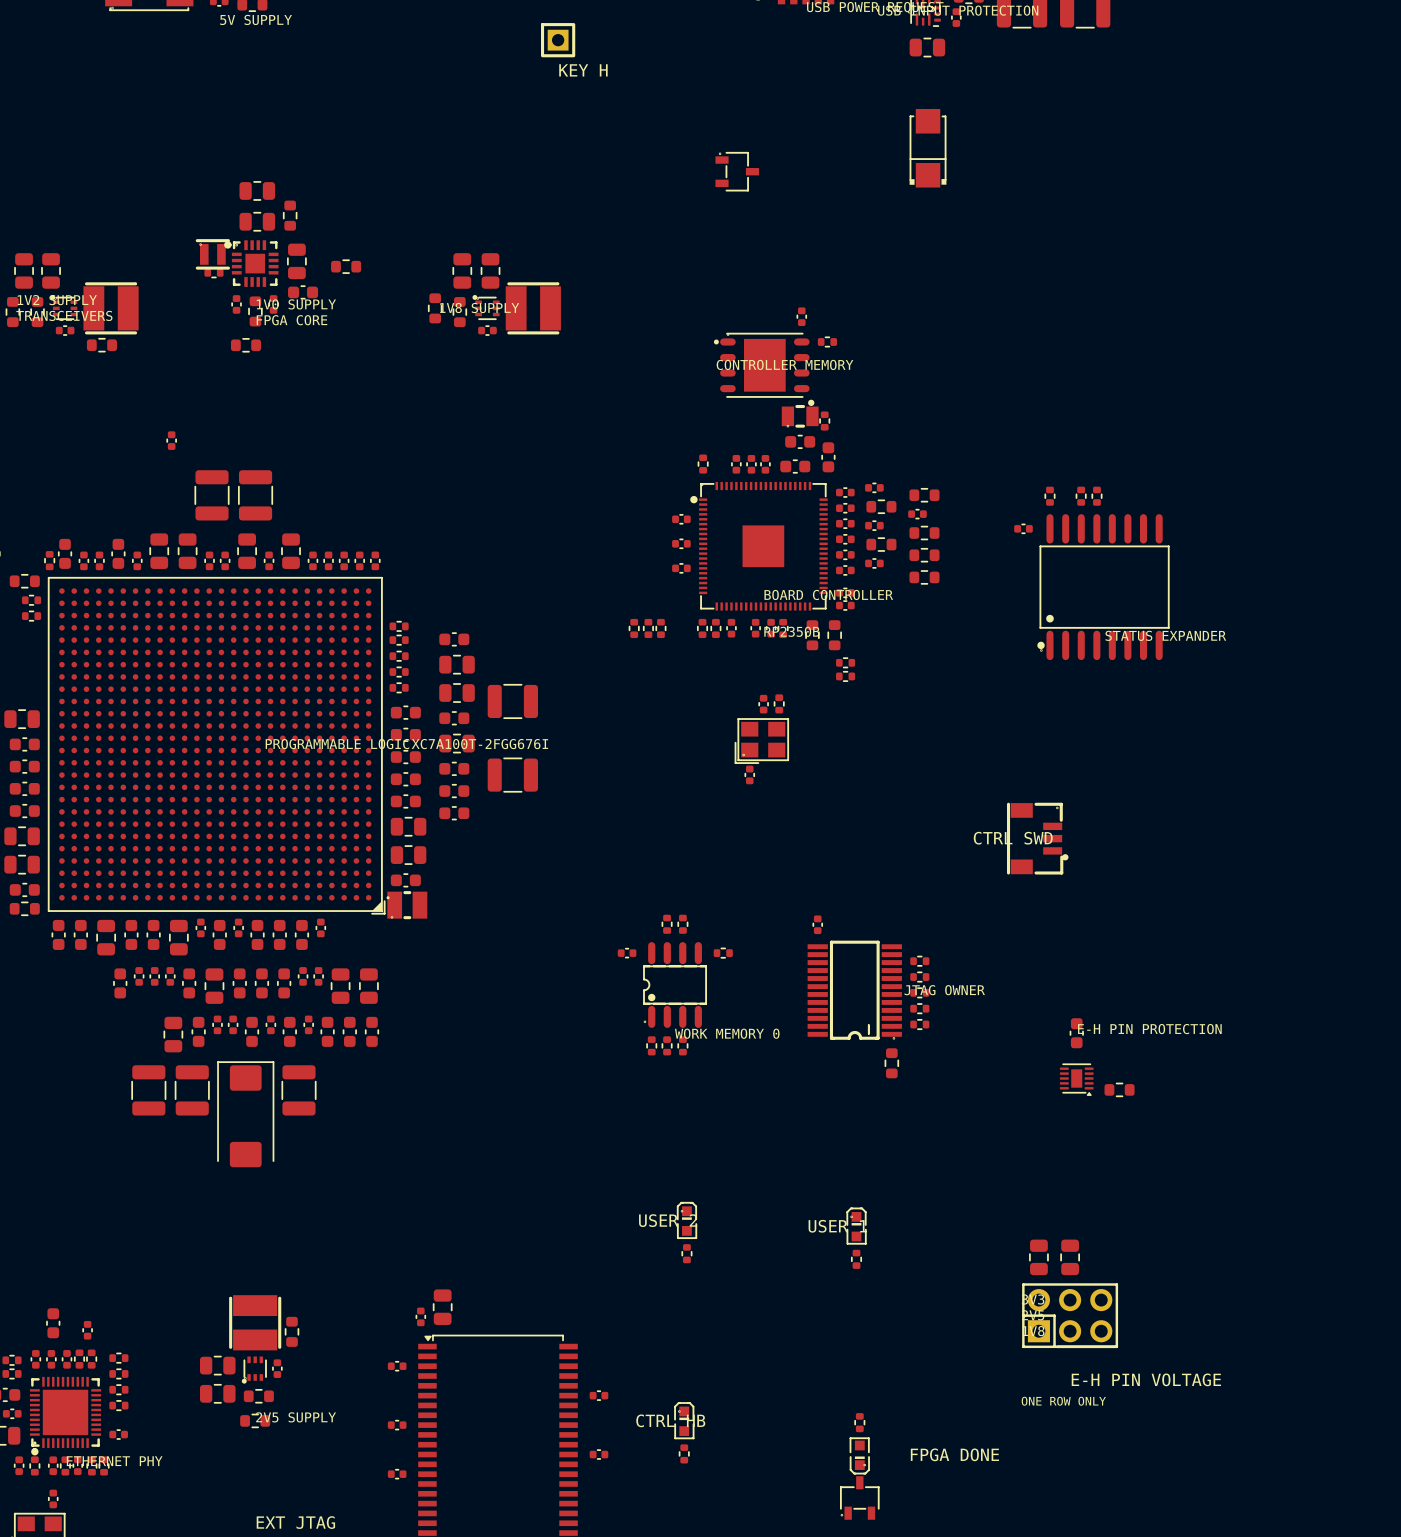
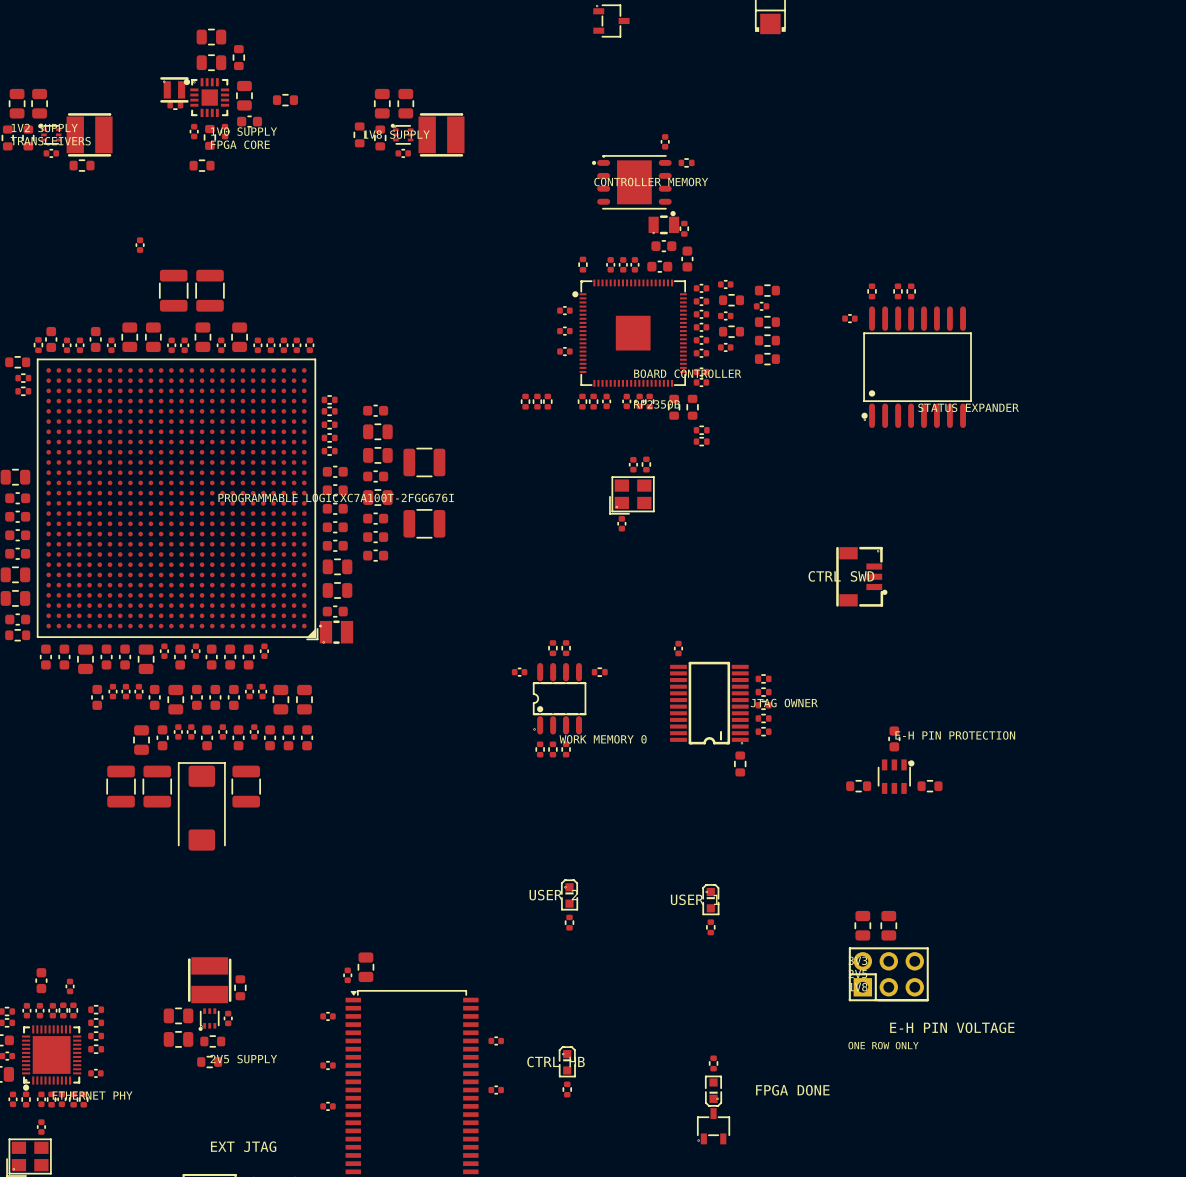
part footprint: [1059, 1063, 1094, 1096] -> [877, 759, 915, 794]
part: none -> (858, 786)

